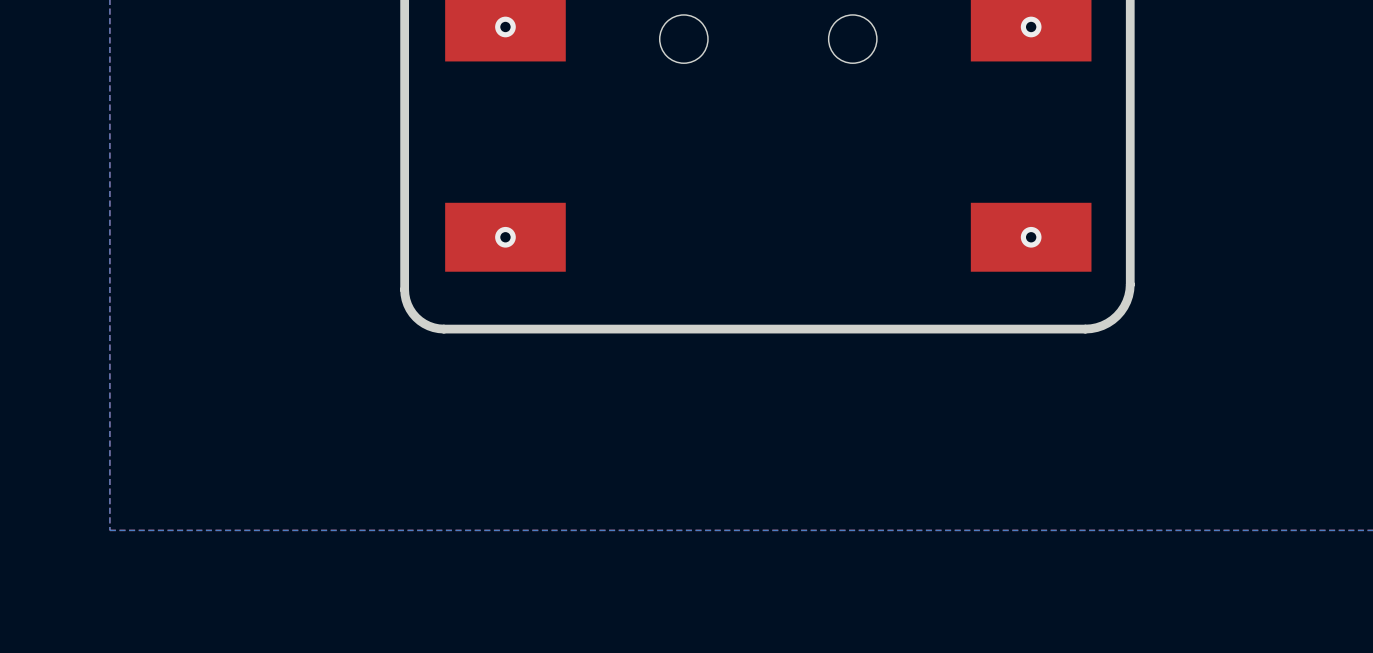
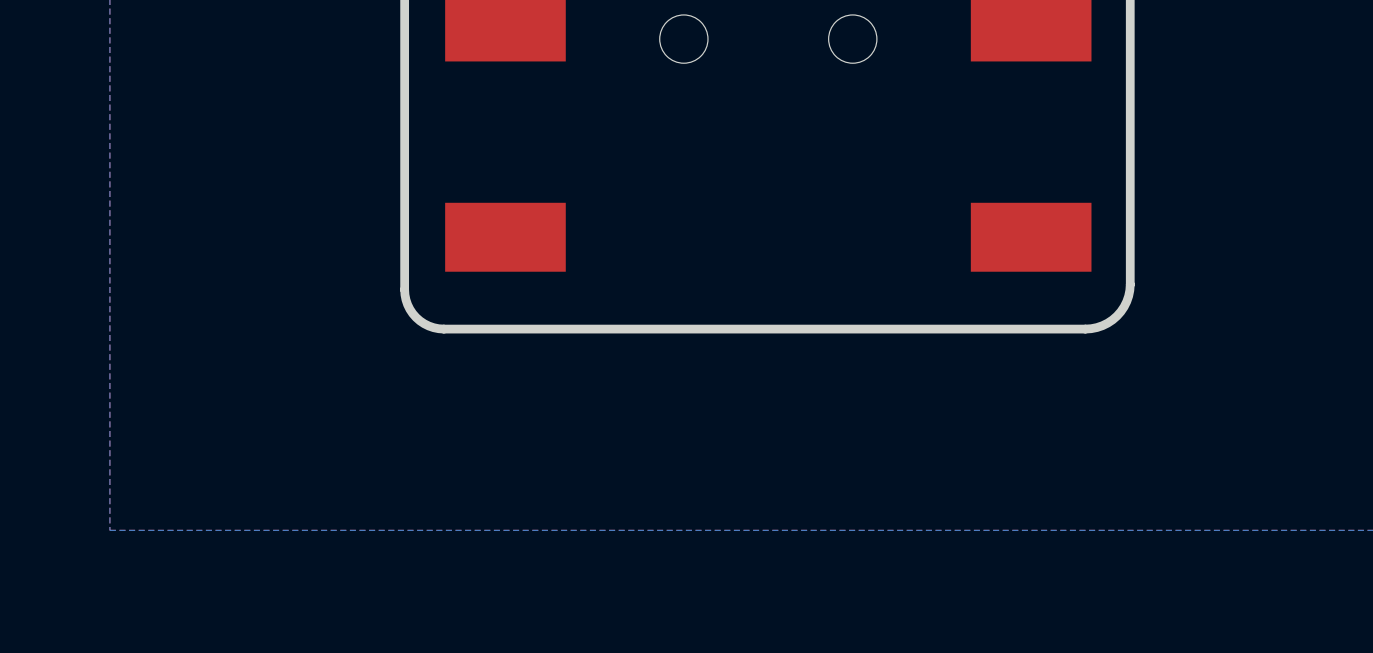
via: (505, 26) -> none
via: (1031, 26) -> none
via: (505, 237) -> none
via: (1031, 237) -> none

